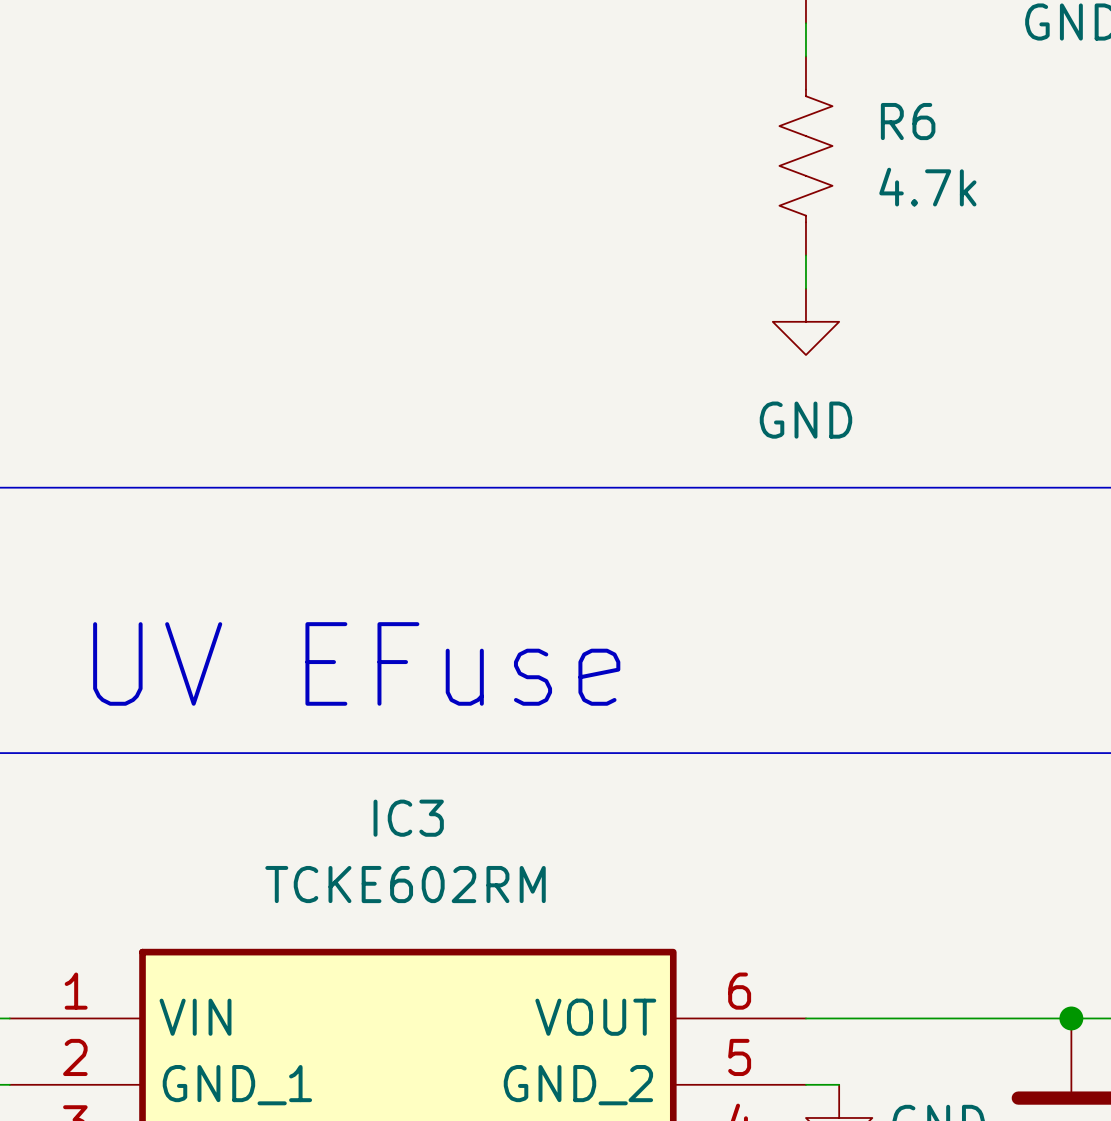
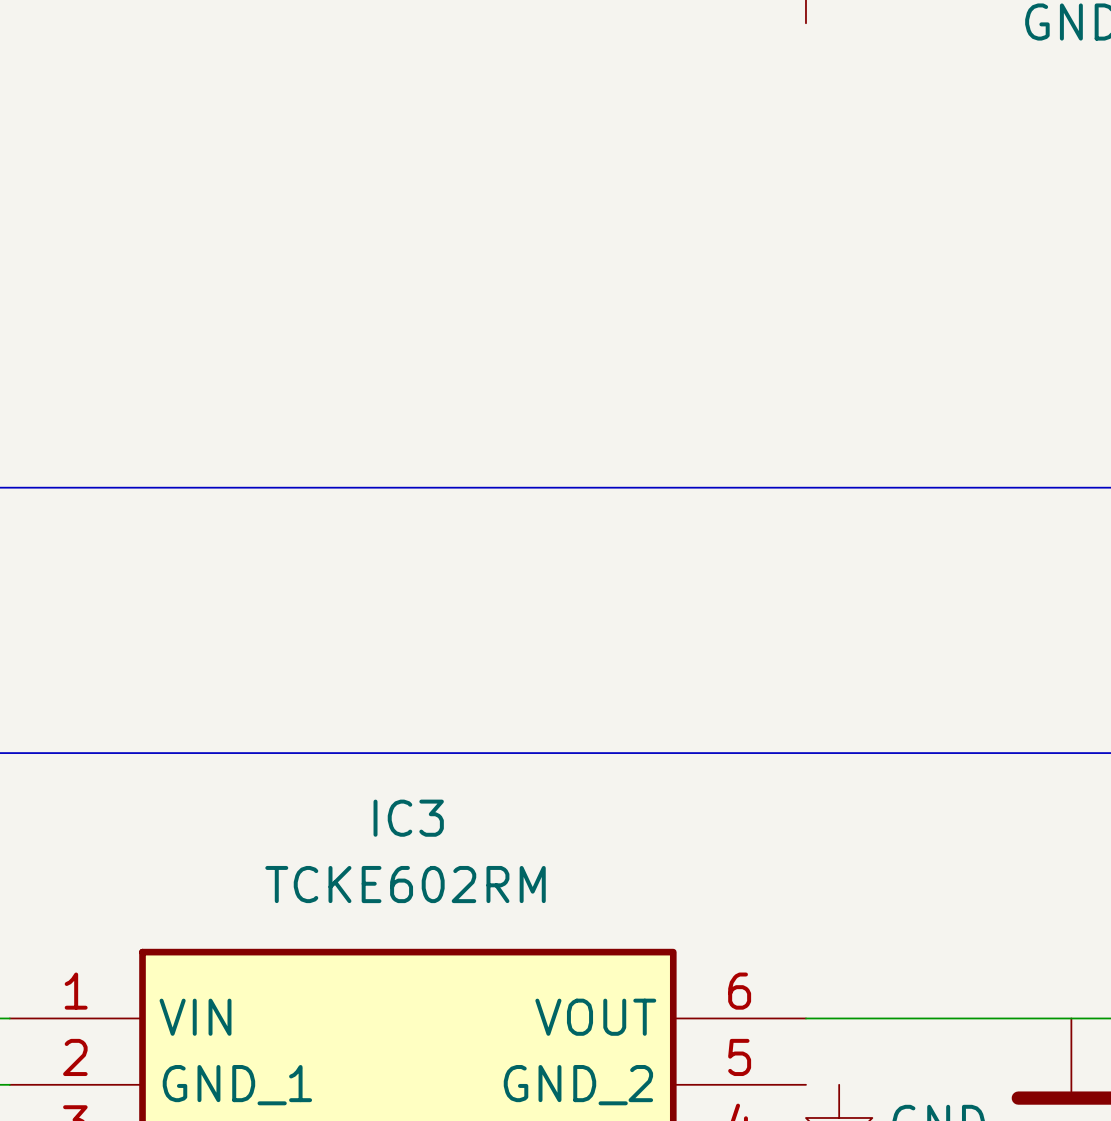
wire: (805, 23) (805, 56) -> none
R6: 4.7k (805, 155) -> none
wire: (805, 255) (805, 288) -> none
power symbol: GND (805, 321) -> none
text: UV EFuse (356, 663) -> none
junction: (1071, 1018) -> none
wire: (805, 1084) (839, 1084) -> none

